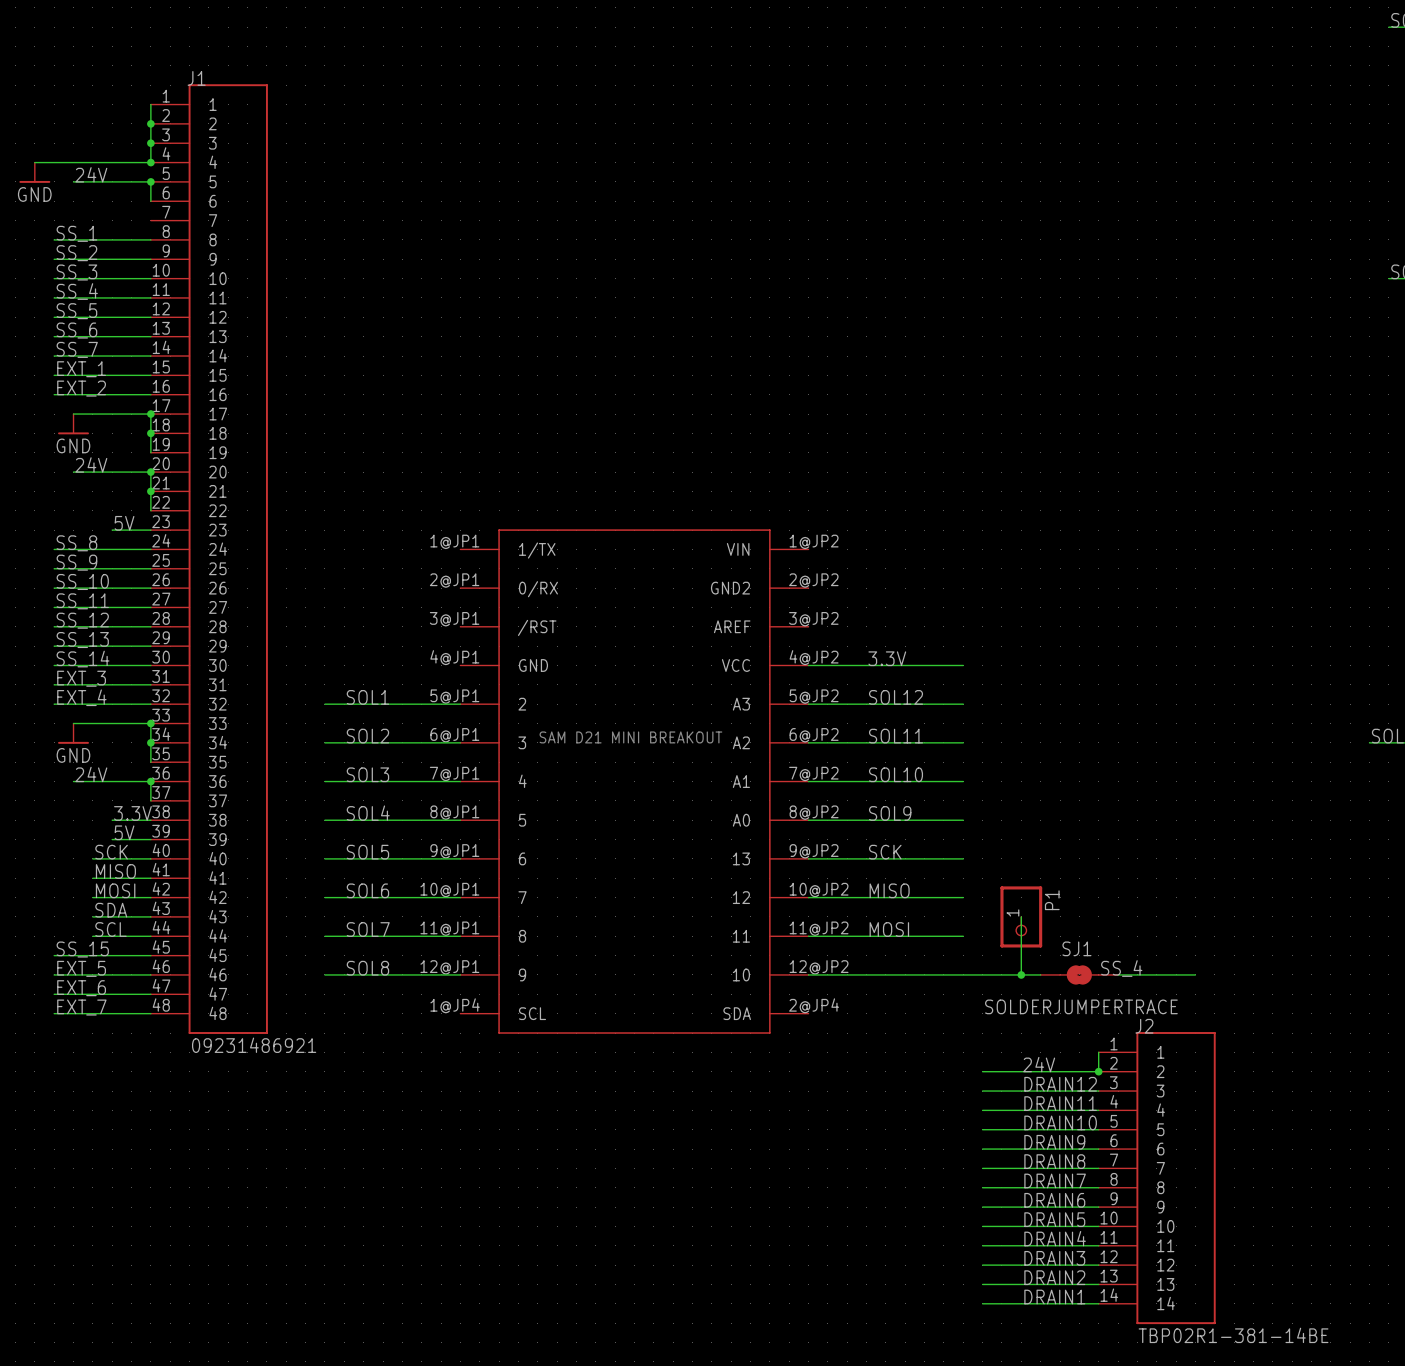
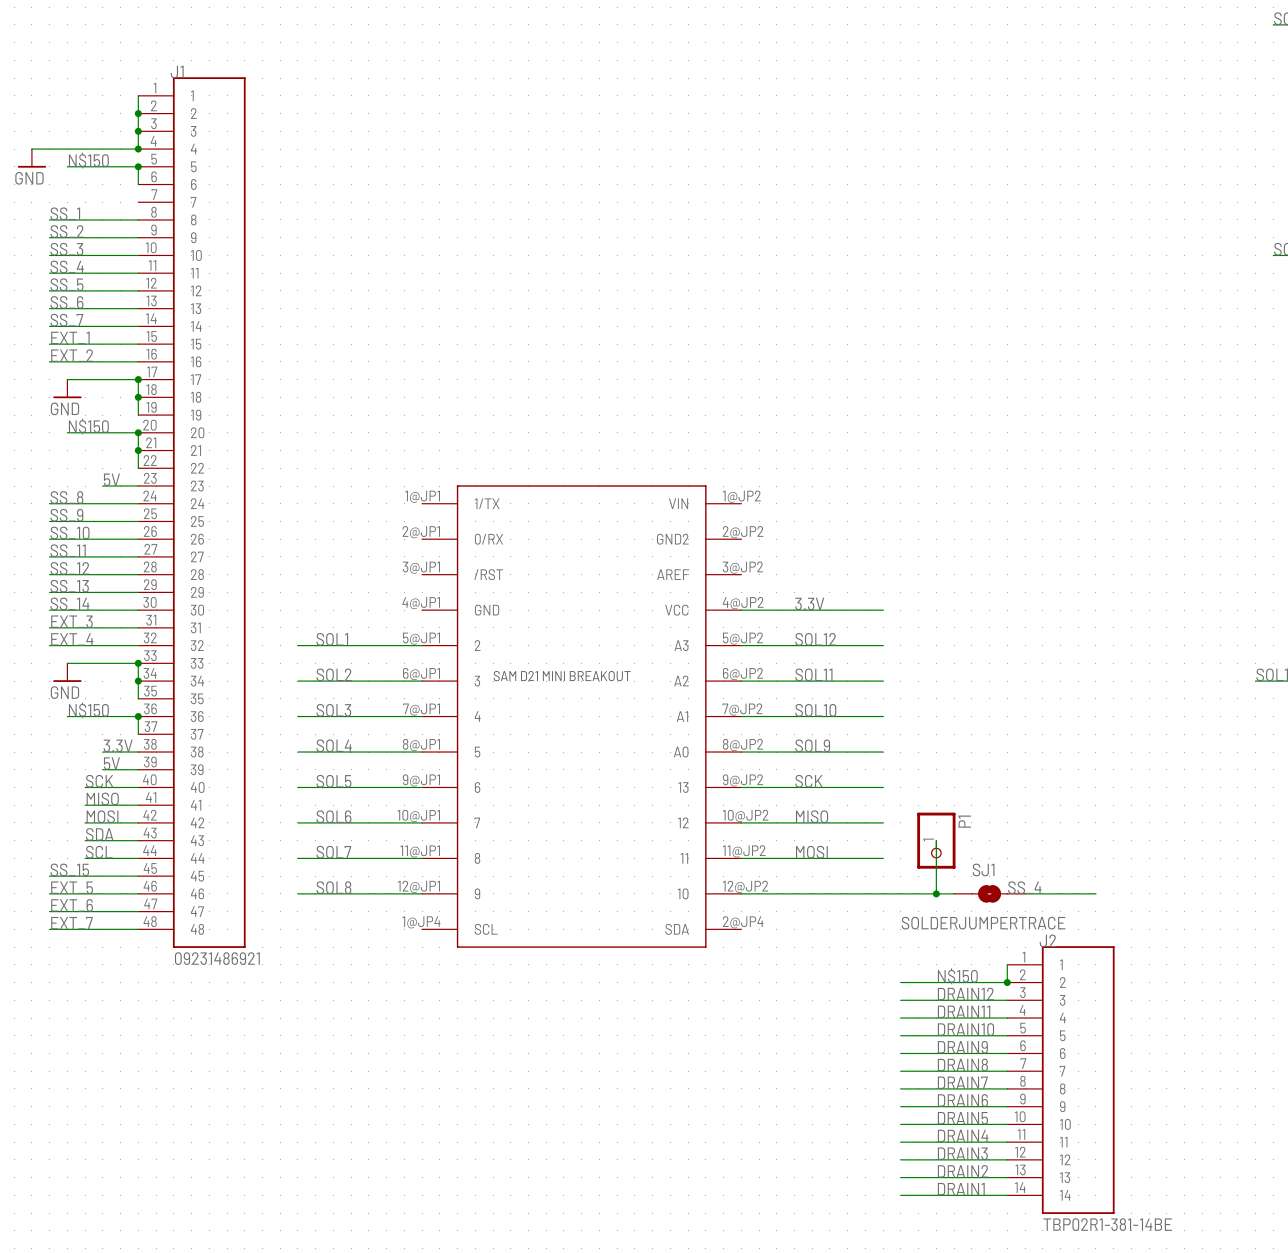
label: 24V (91, 174) -> N$150 (88, 160)
label: 24V (91, 464) -> N$150 (88, 426)
label: 24V (91, 774) -> N$150 (88, 710)
label: 24V (1039, 1064) -> N$150 (957, 976)

